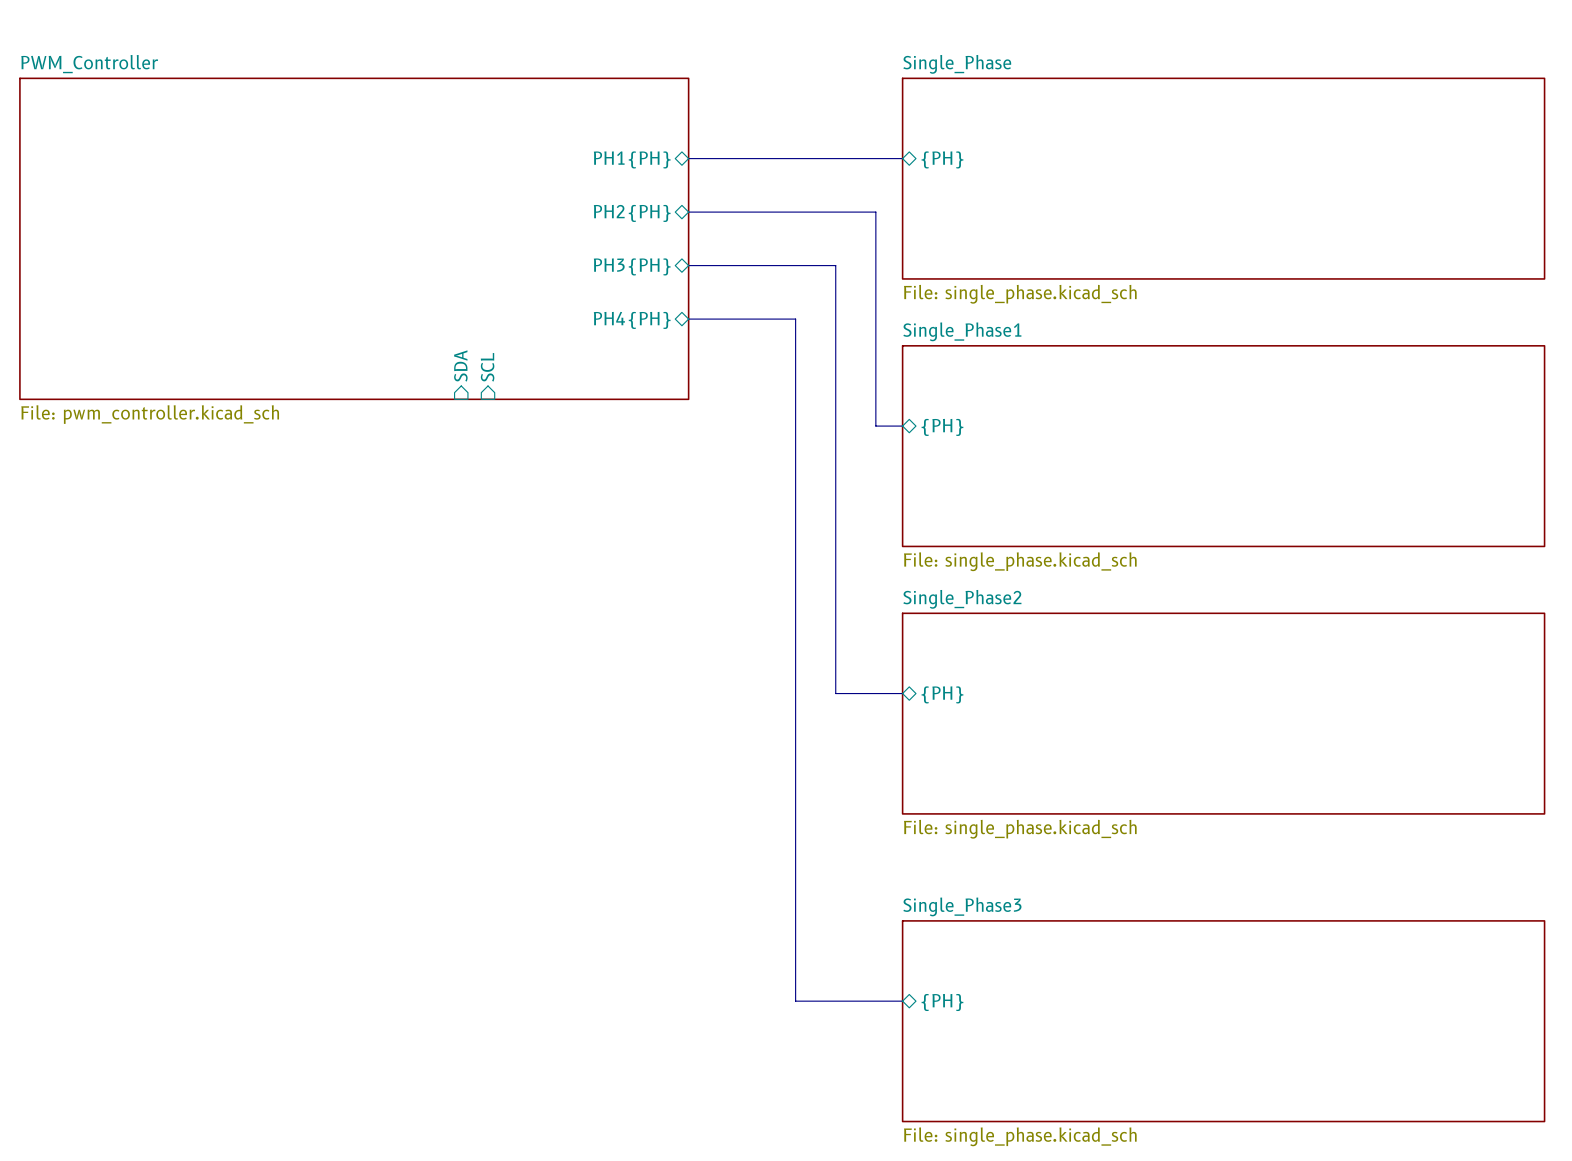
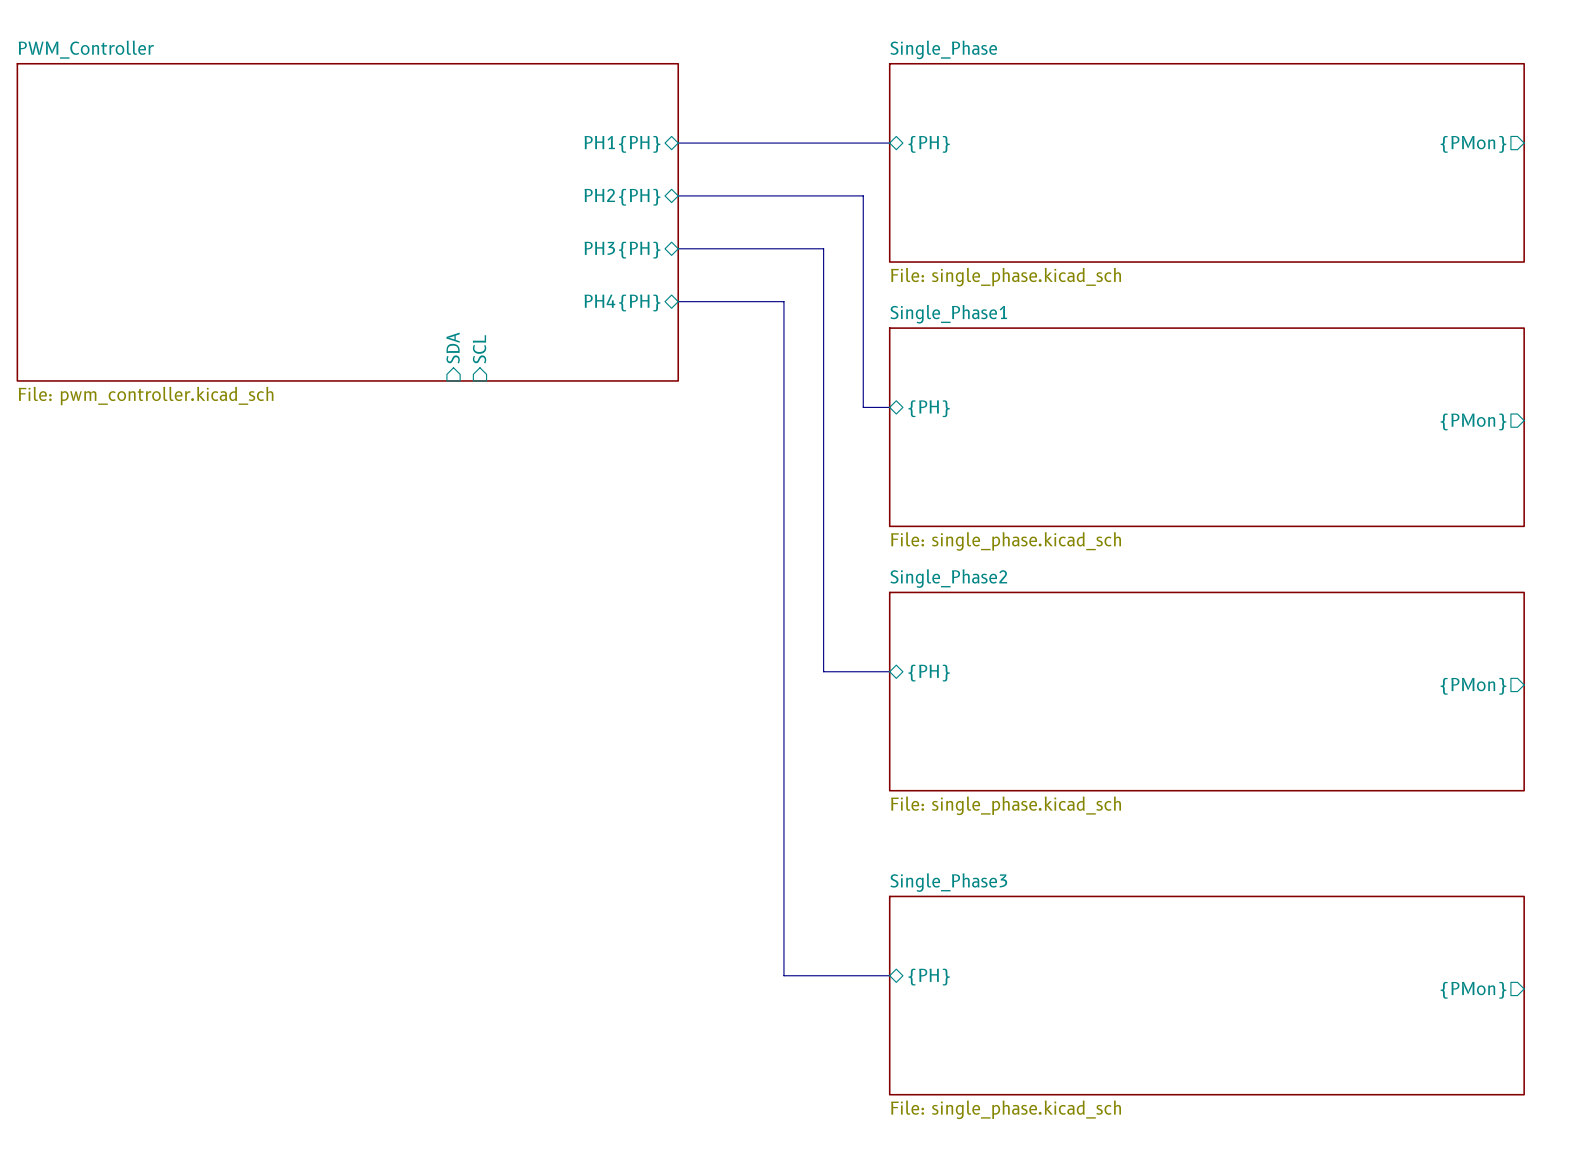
sheet pin: none -> {PMon} (1473, 144)
sheet pin: none -> {PMon} (1473, 421)
sheet pin: none -> {PMon} (1473, 686)
sheet pin: none -> {PMon} (1473, 990)

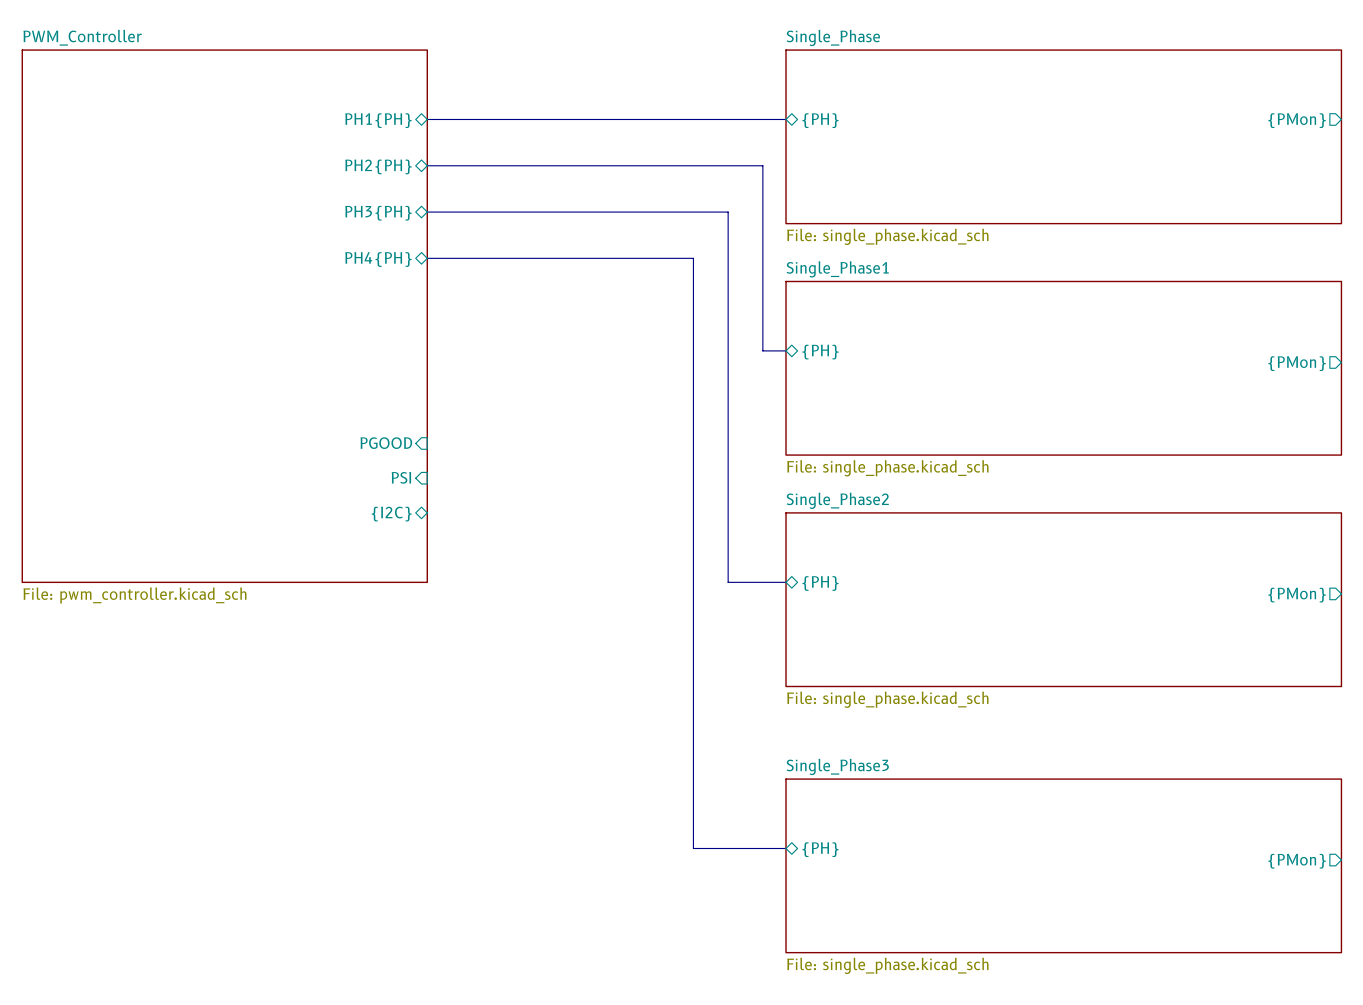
bus: none -> (427, 119) (600, 119)
sheet pin position: PH1{PH} (622, 144) -> PH1{PH} (378, 120)
bus: none -> (427, 165) (600, 165)
sheet pin position: PH2{PH} (622, 197) -> PH2{PH} (378, 166)
sheet PWM_Controller: File: pwm_controller.kicad_sch (347, 222) -> none
bus: none -> (427, 212) (600, 212)
sheet pin position: PH3{PH} (622, 250) -> PH3{PH} (378, 213)
bus: none -> (427, 258) (600, 258)
sheet pin position: PH4{PH} (622, 302) -> PH4{PH} (378, 259)
sheet pin: SDA (453, 348) -> none
sheet pin: SCL (479, 349) -> none
sheet PWM_Controller: none -> File: pwm_controller.kicad_sch (224, 316)
sheet pin: none -> PGOOD (386, 443)
sheet pin: none -> PSI (401, 477)
sheet pin: none -> {I2C} (391, 514)

